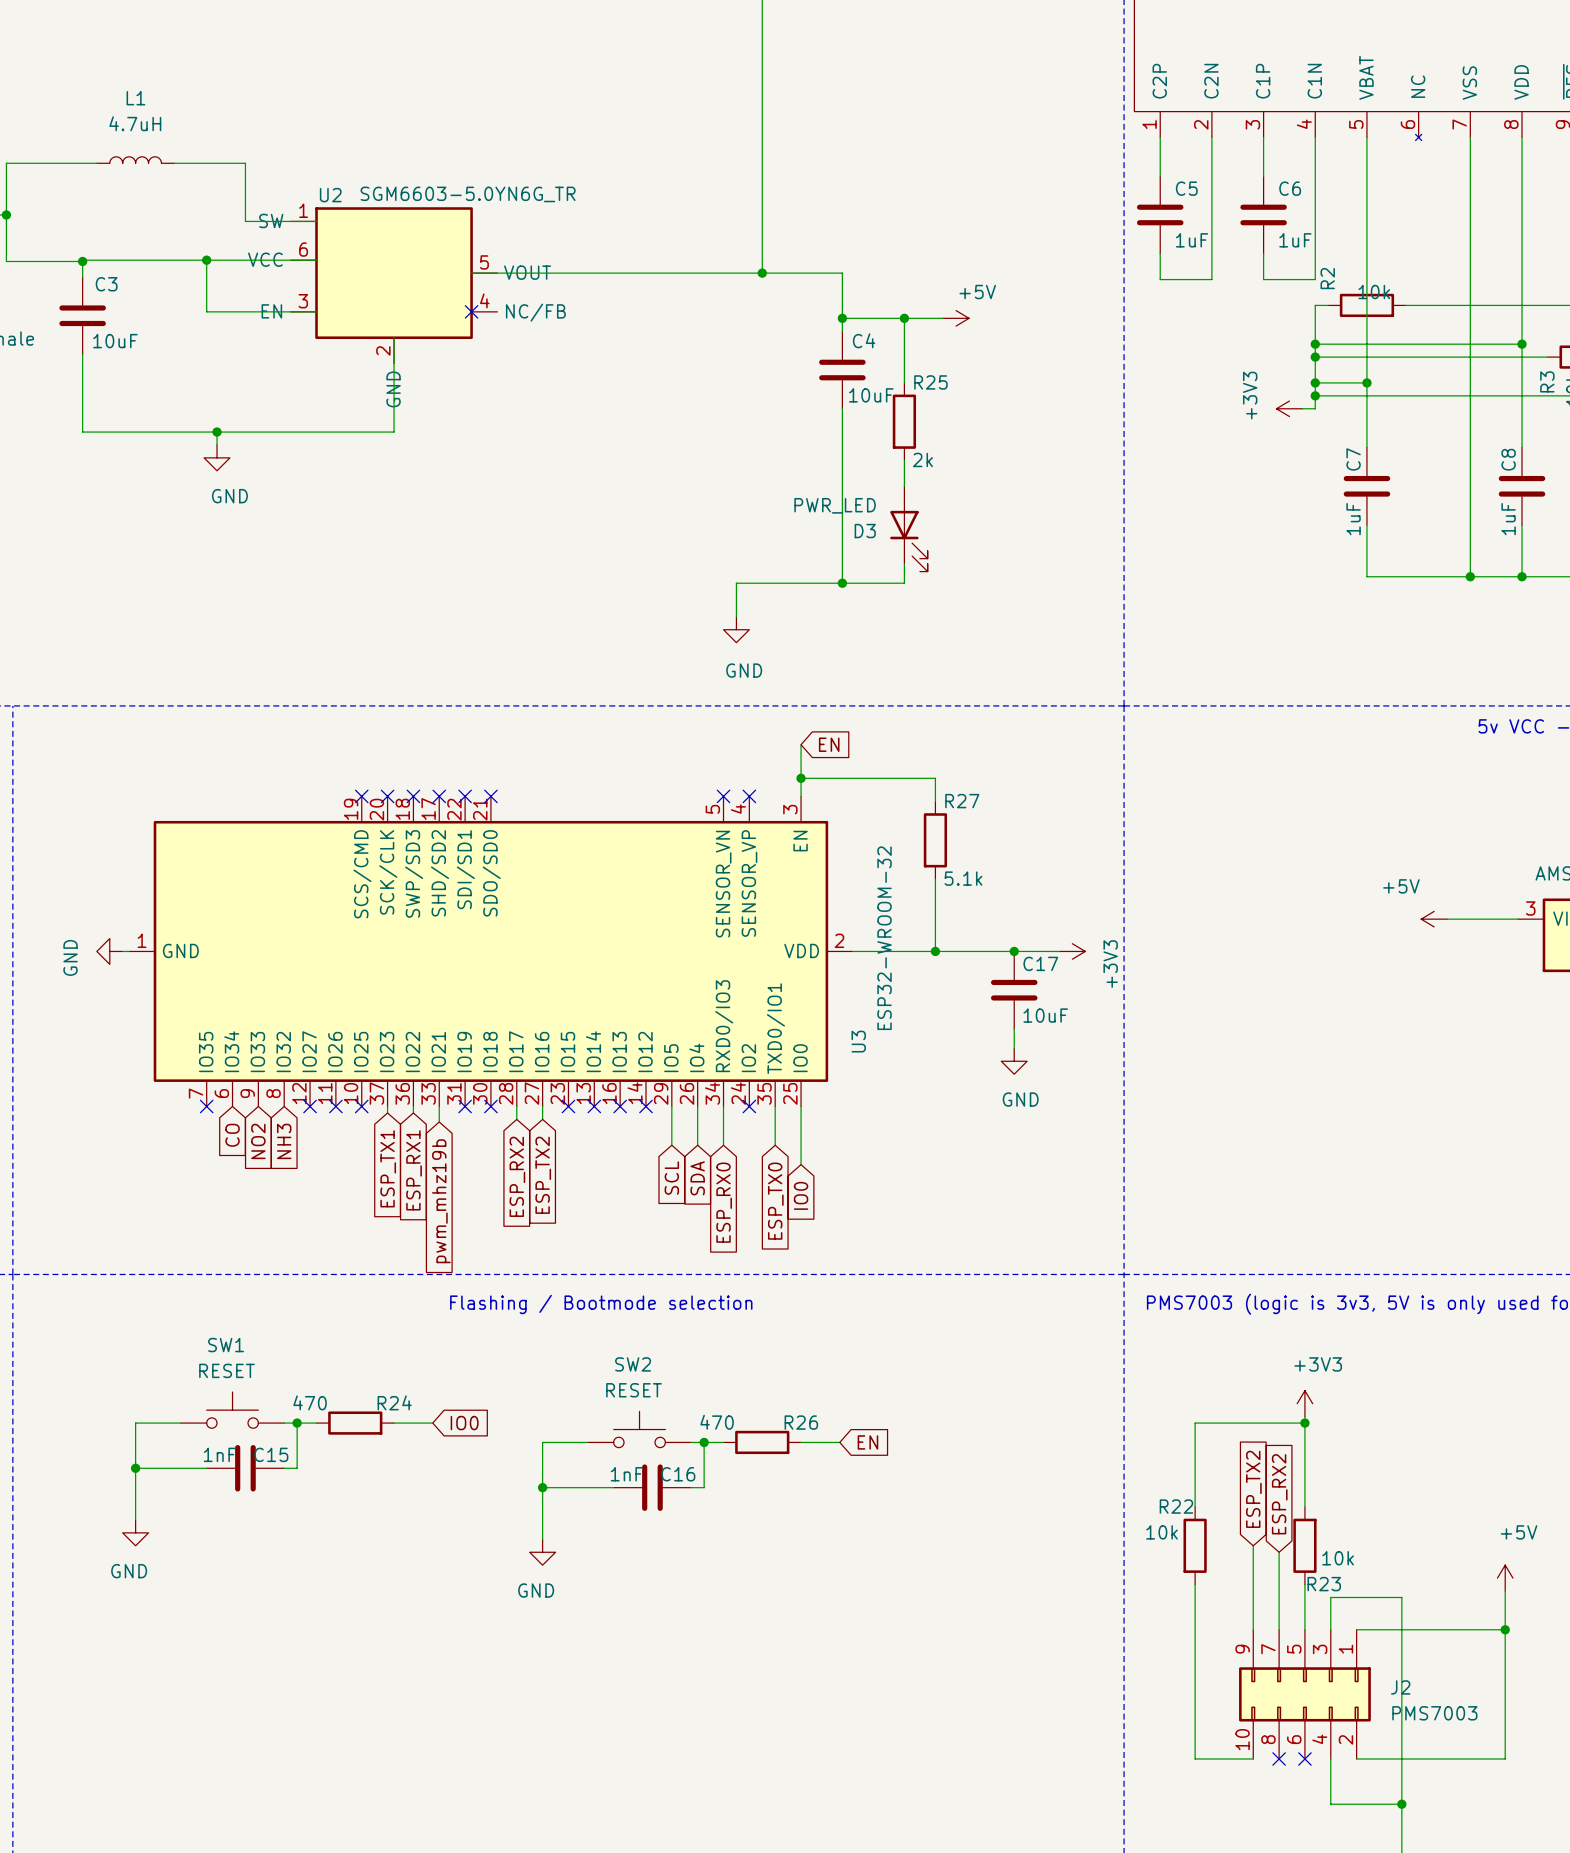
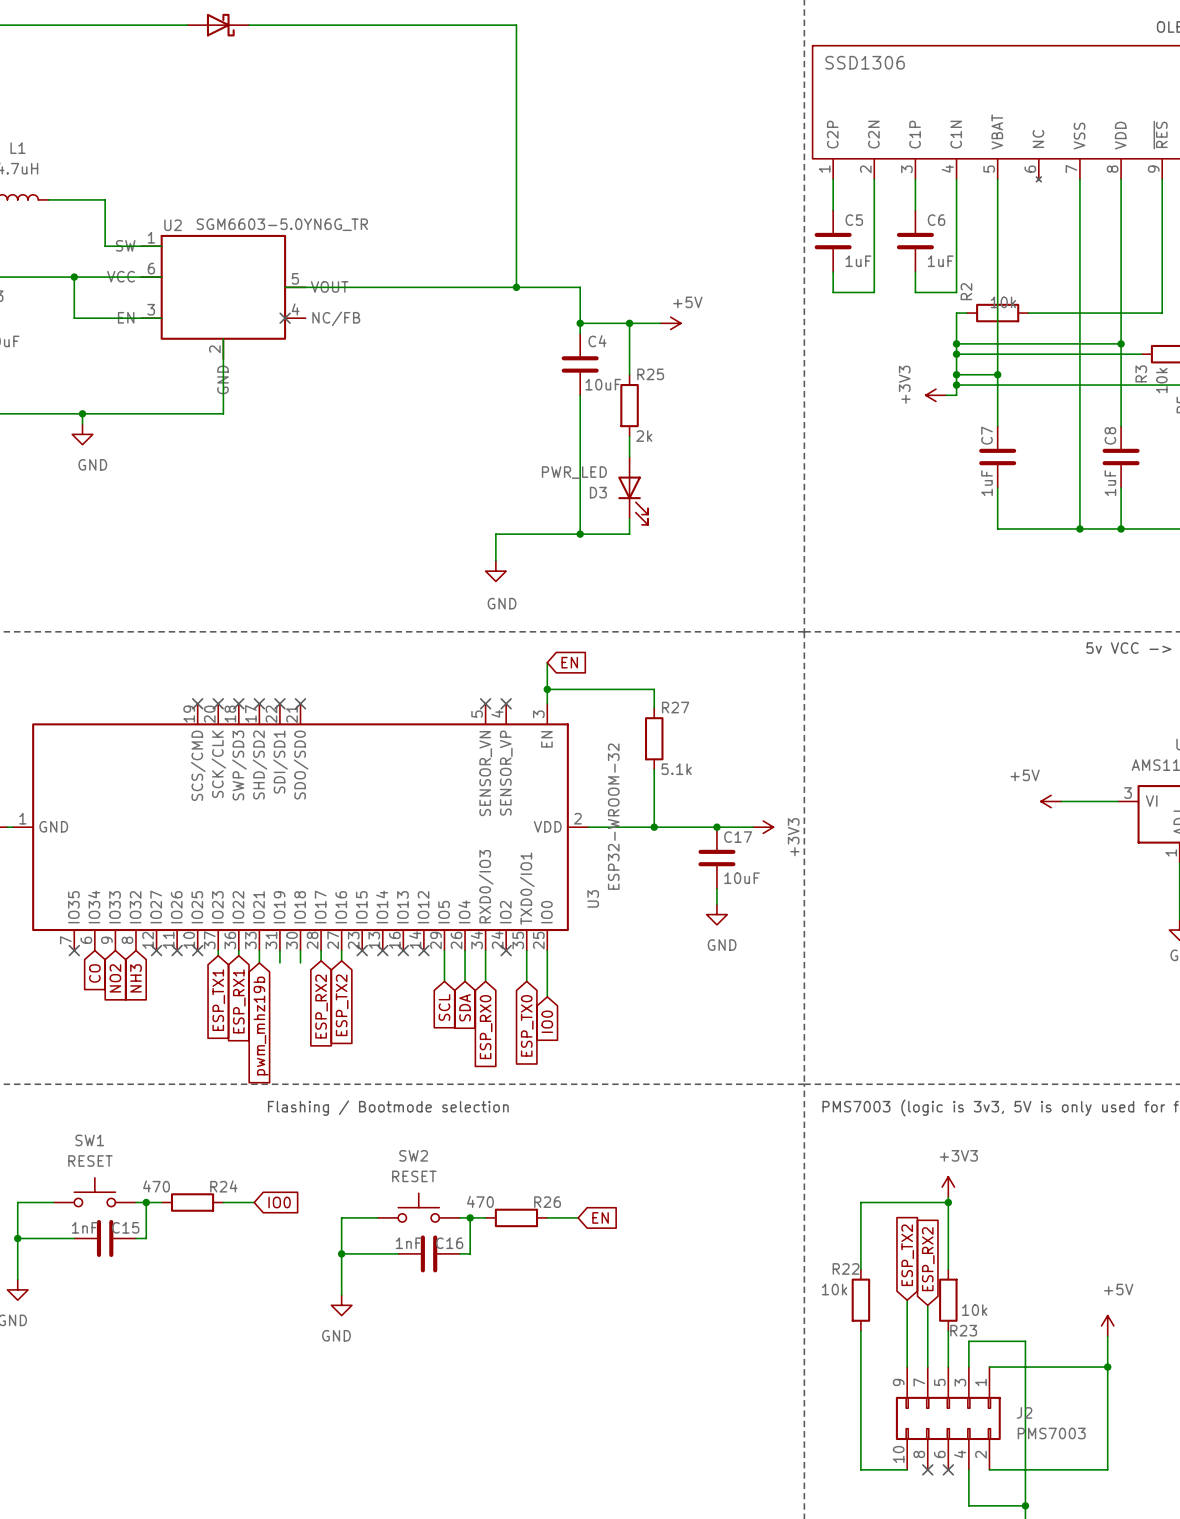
wire: none -> (279, 950) (279, 962)
no-connect mark: (465, 1106) -> none
wire: none -> (300, 950) (300, 962)
no-connect mark: (490, 1106) -> none

